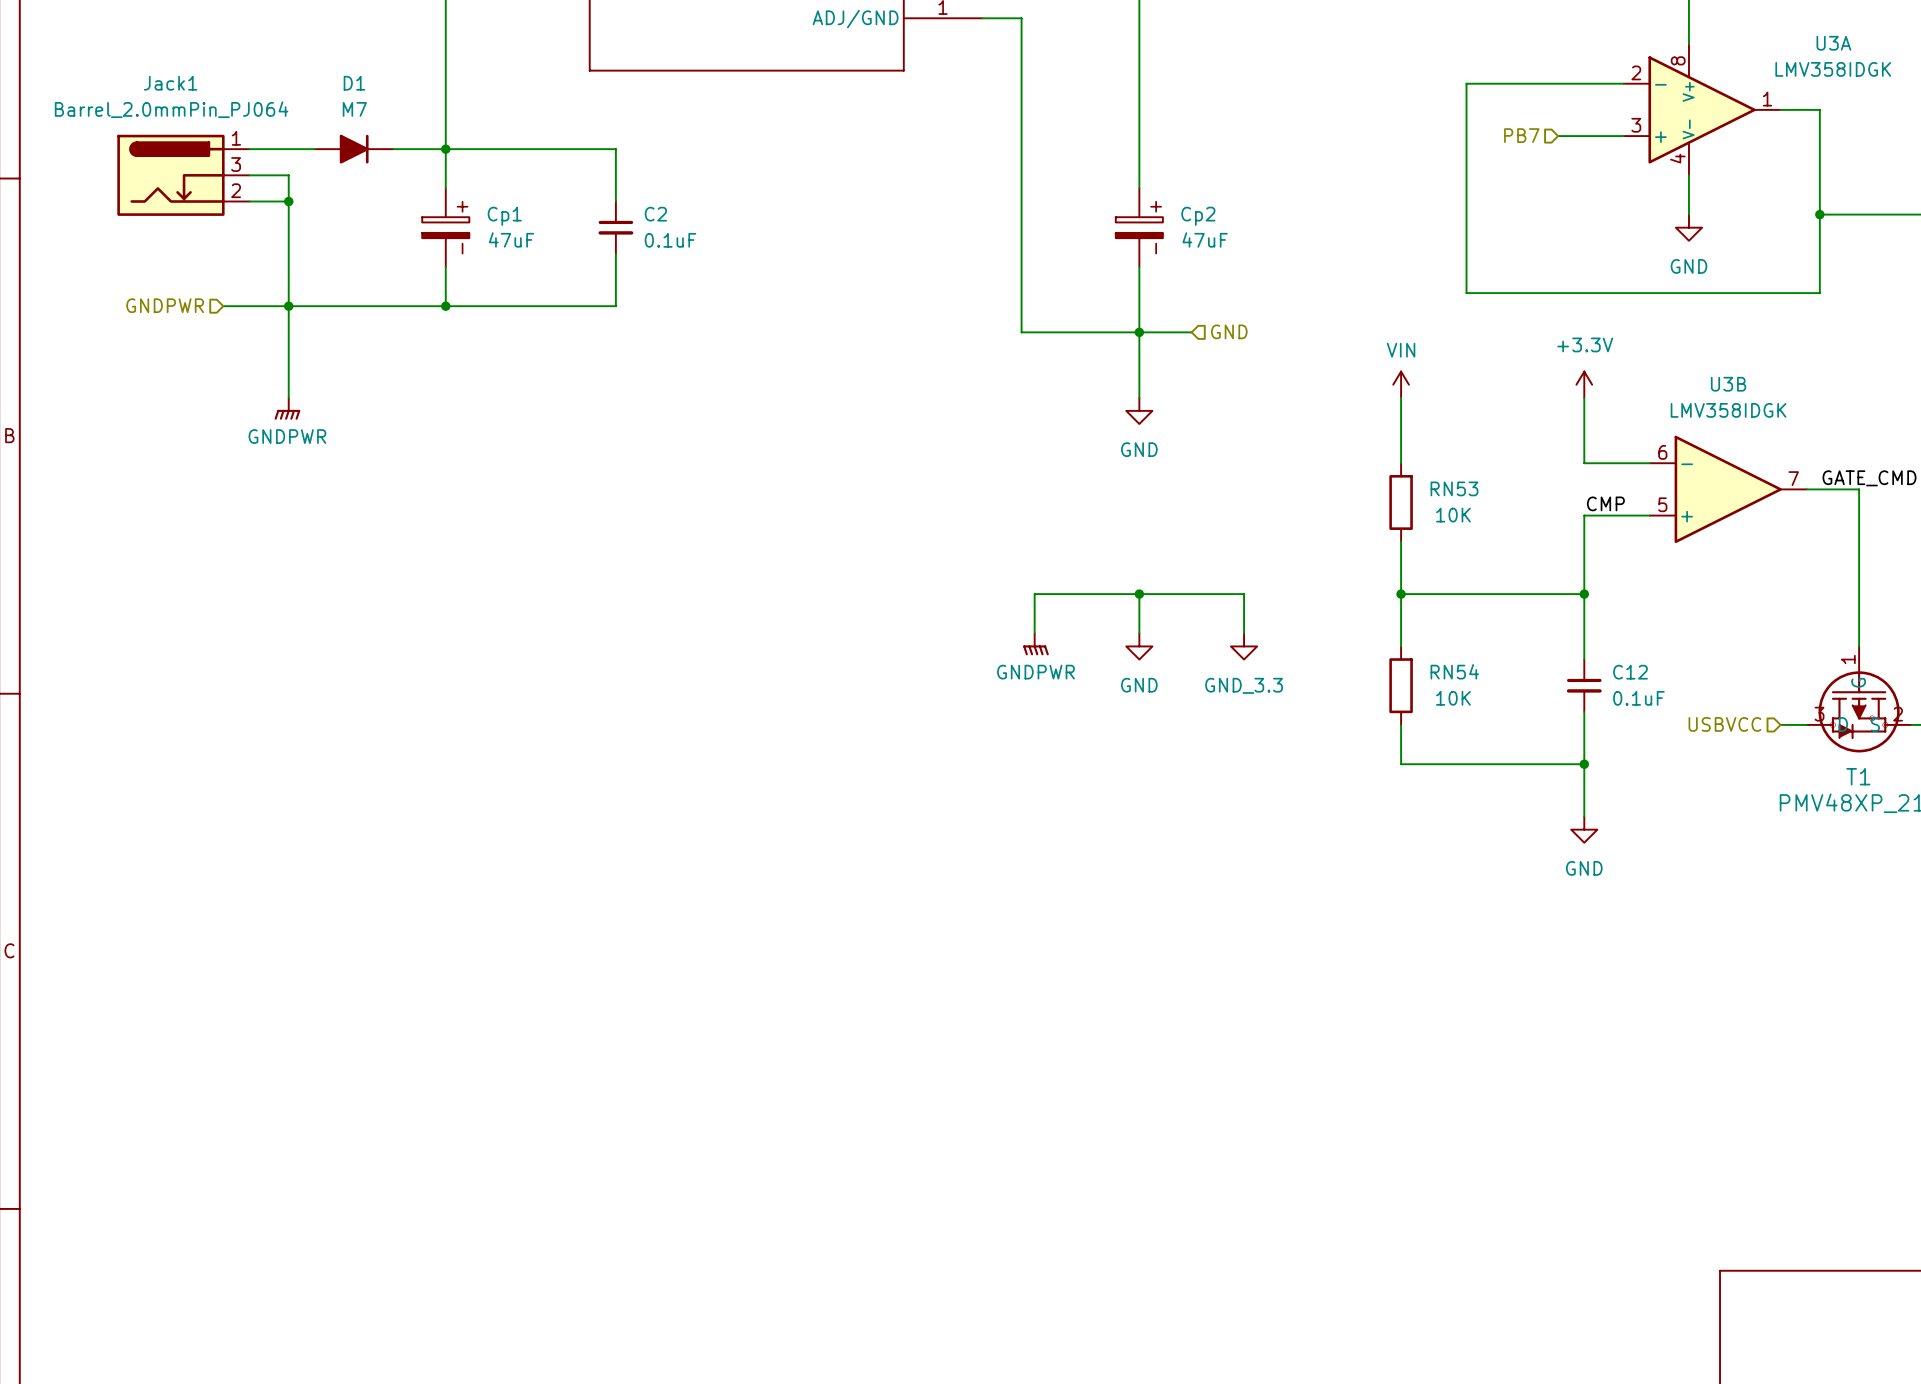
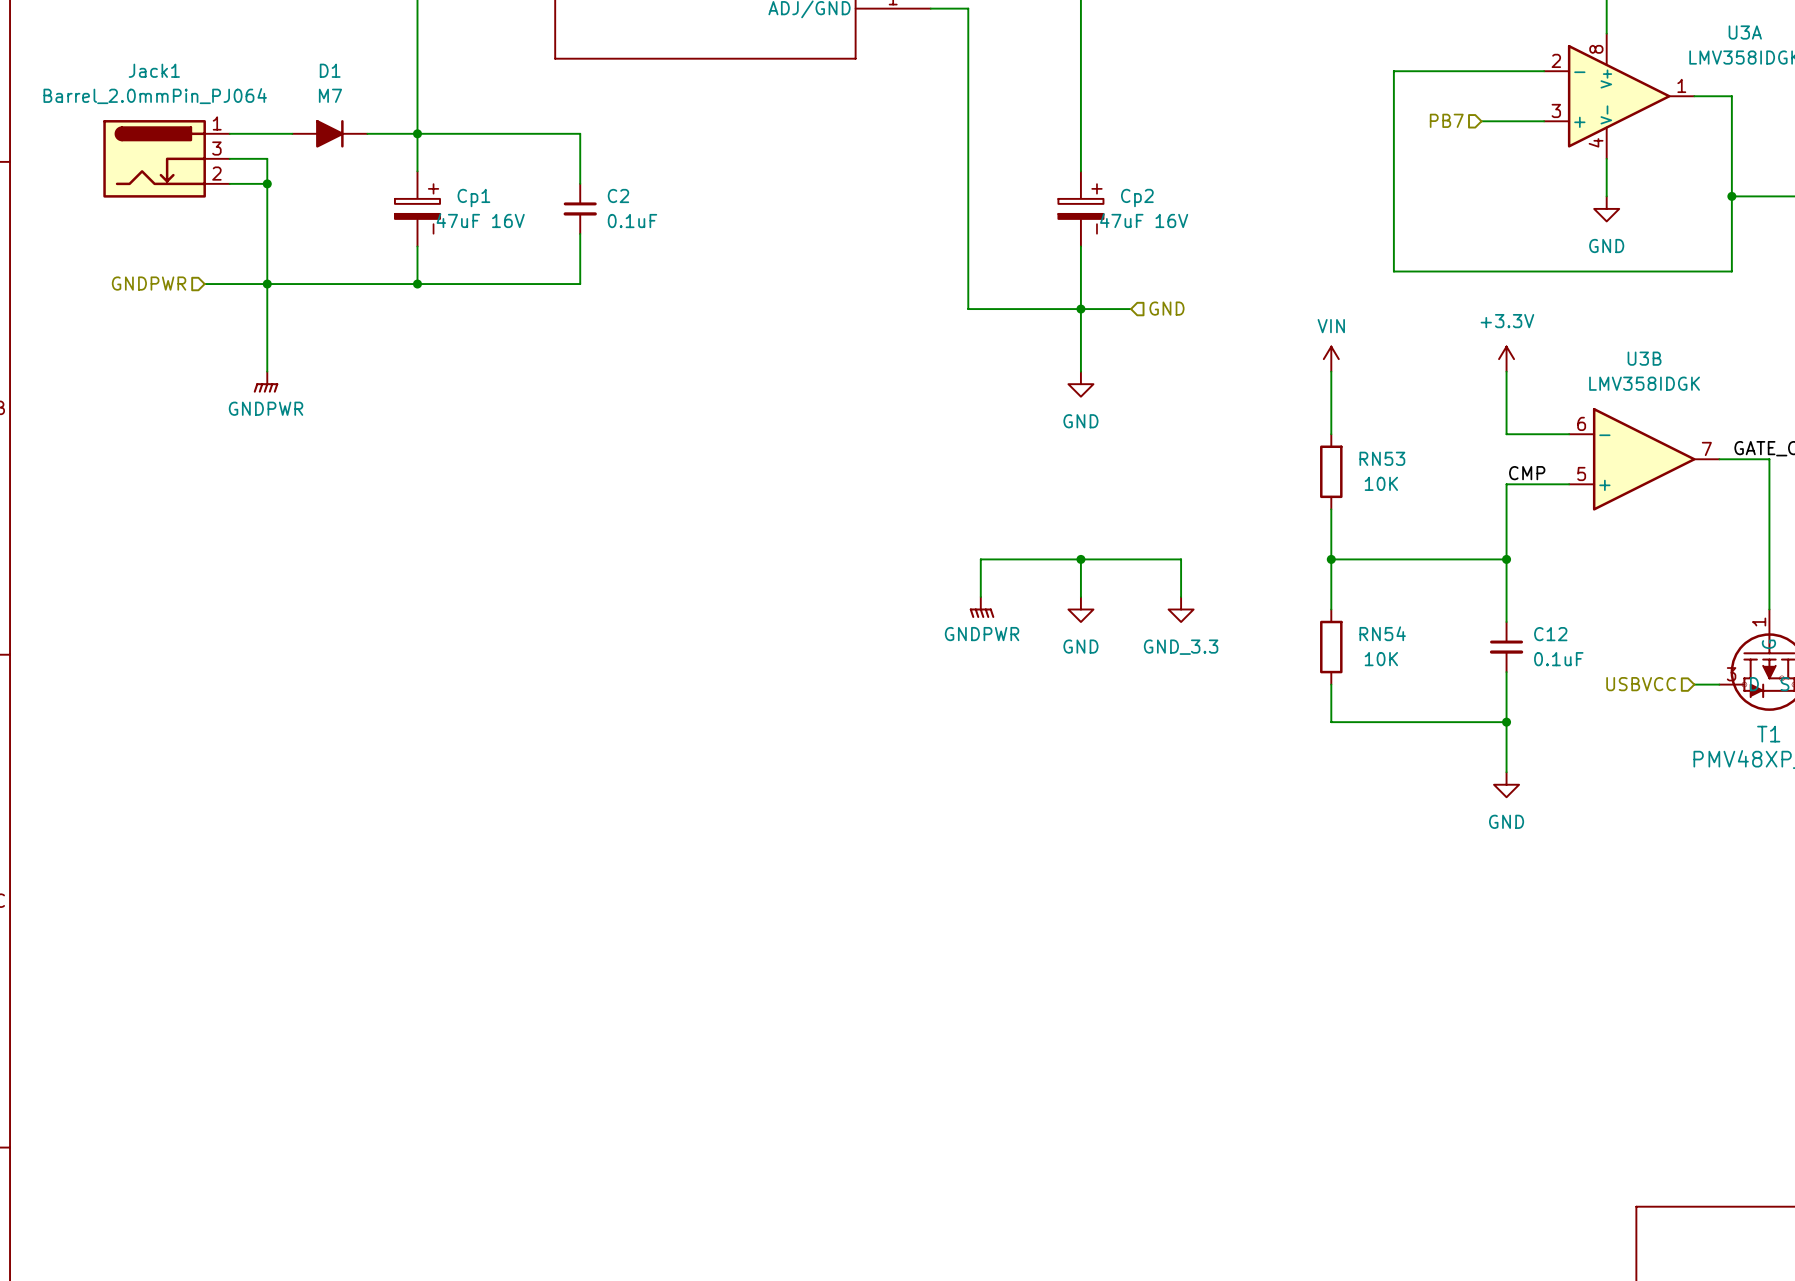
Cp1 text: 47uF (511, 239) -> 47uF 16V (480, 220)
Cp2 text: 47uF (1205, 239) -> 47uF 16V (1144, 220)

